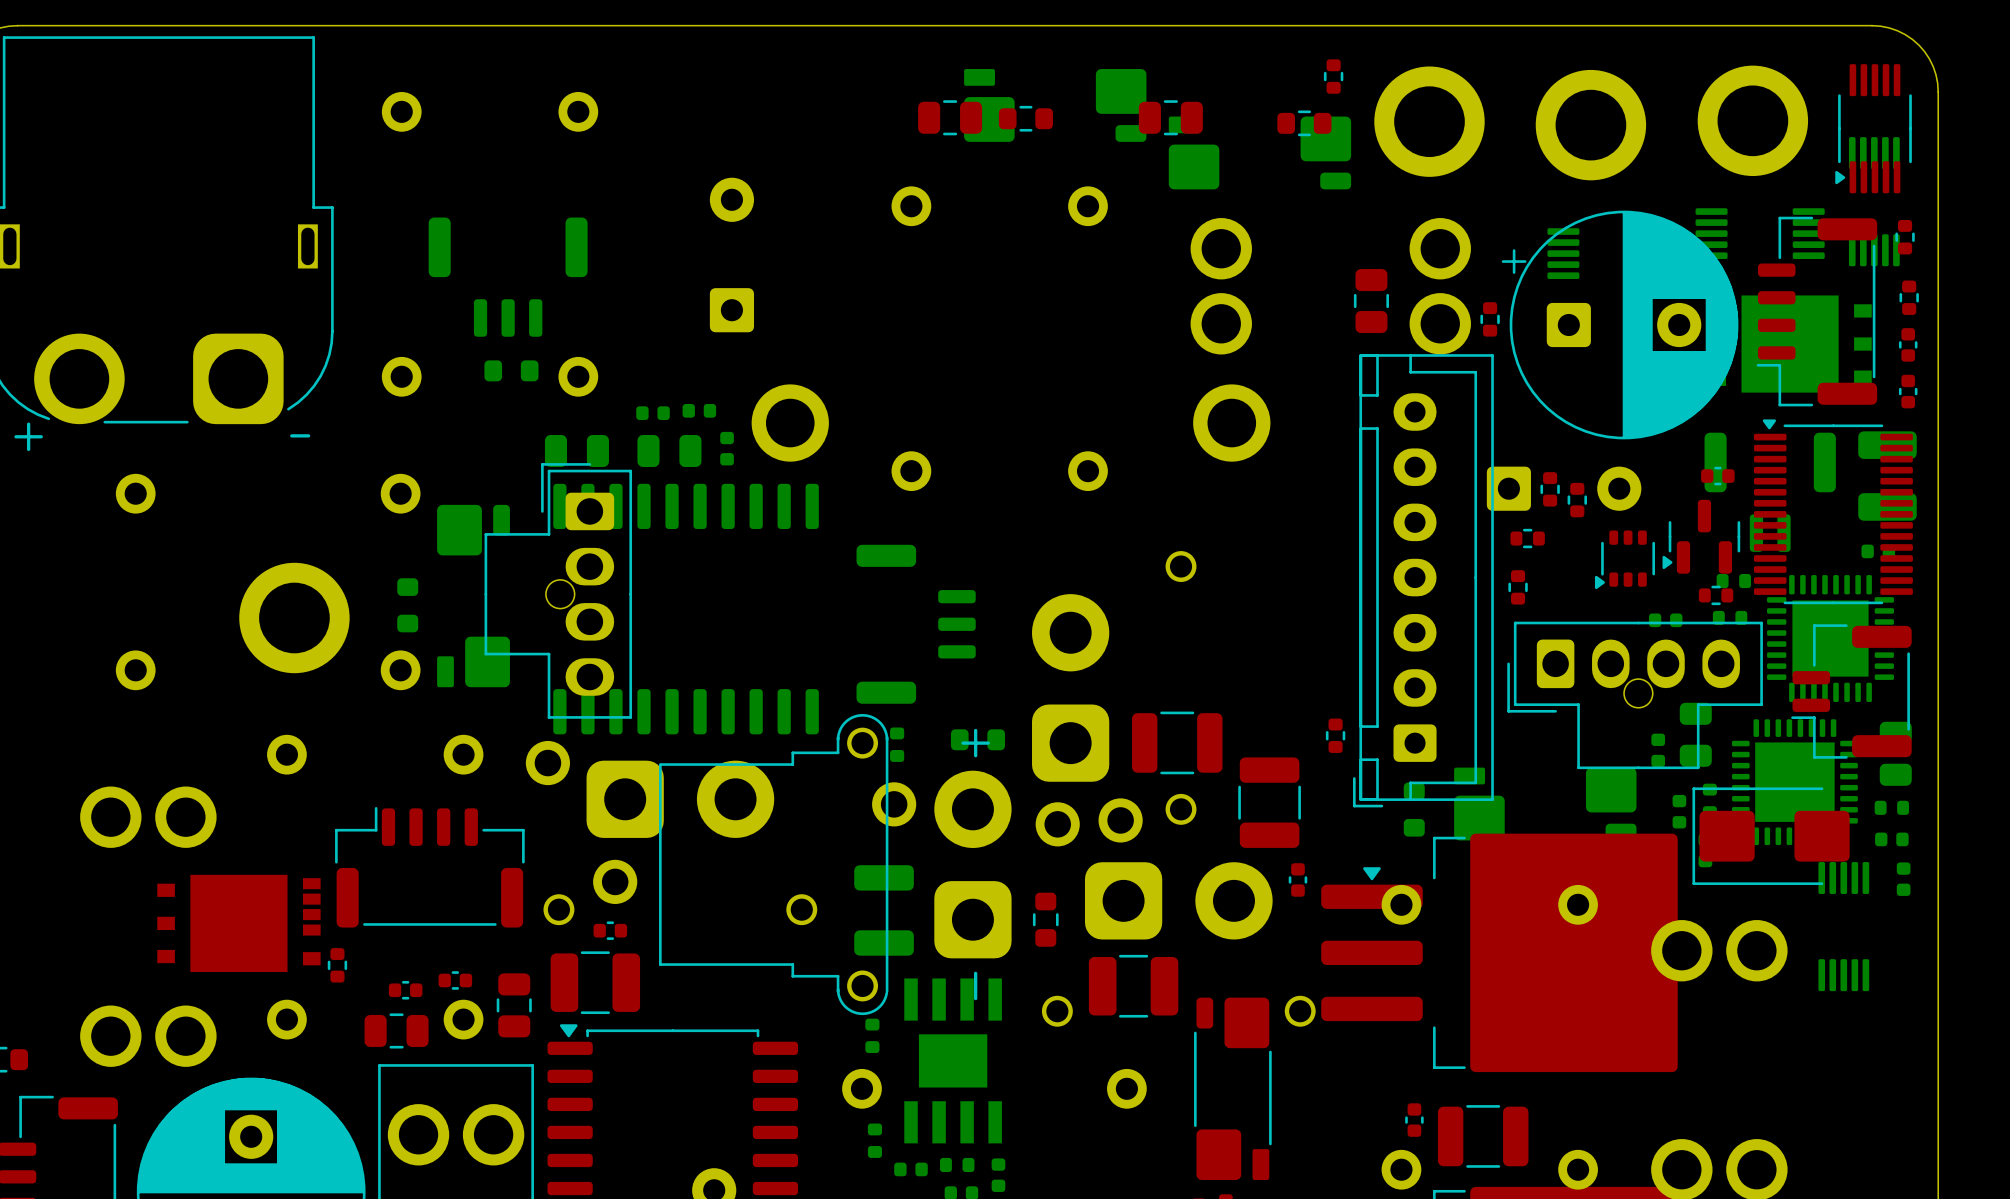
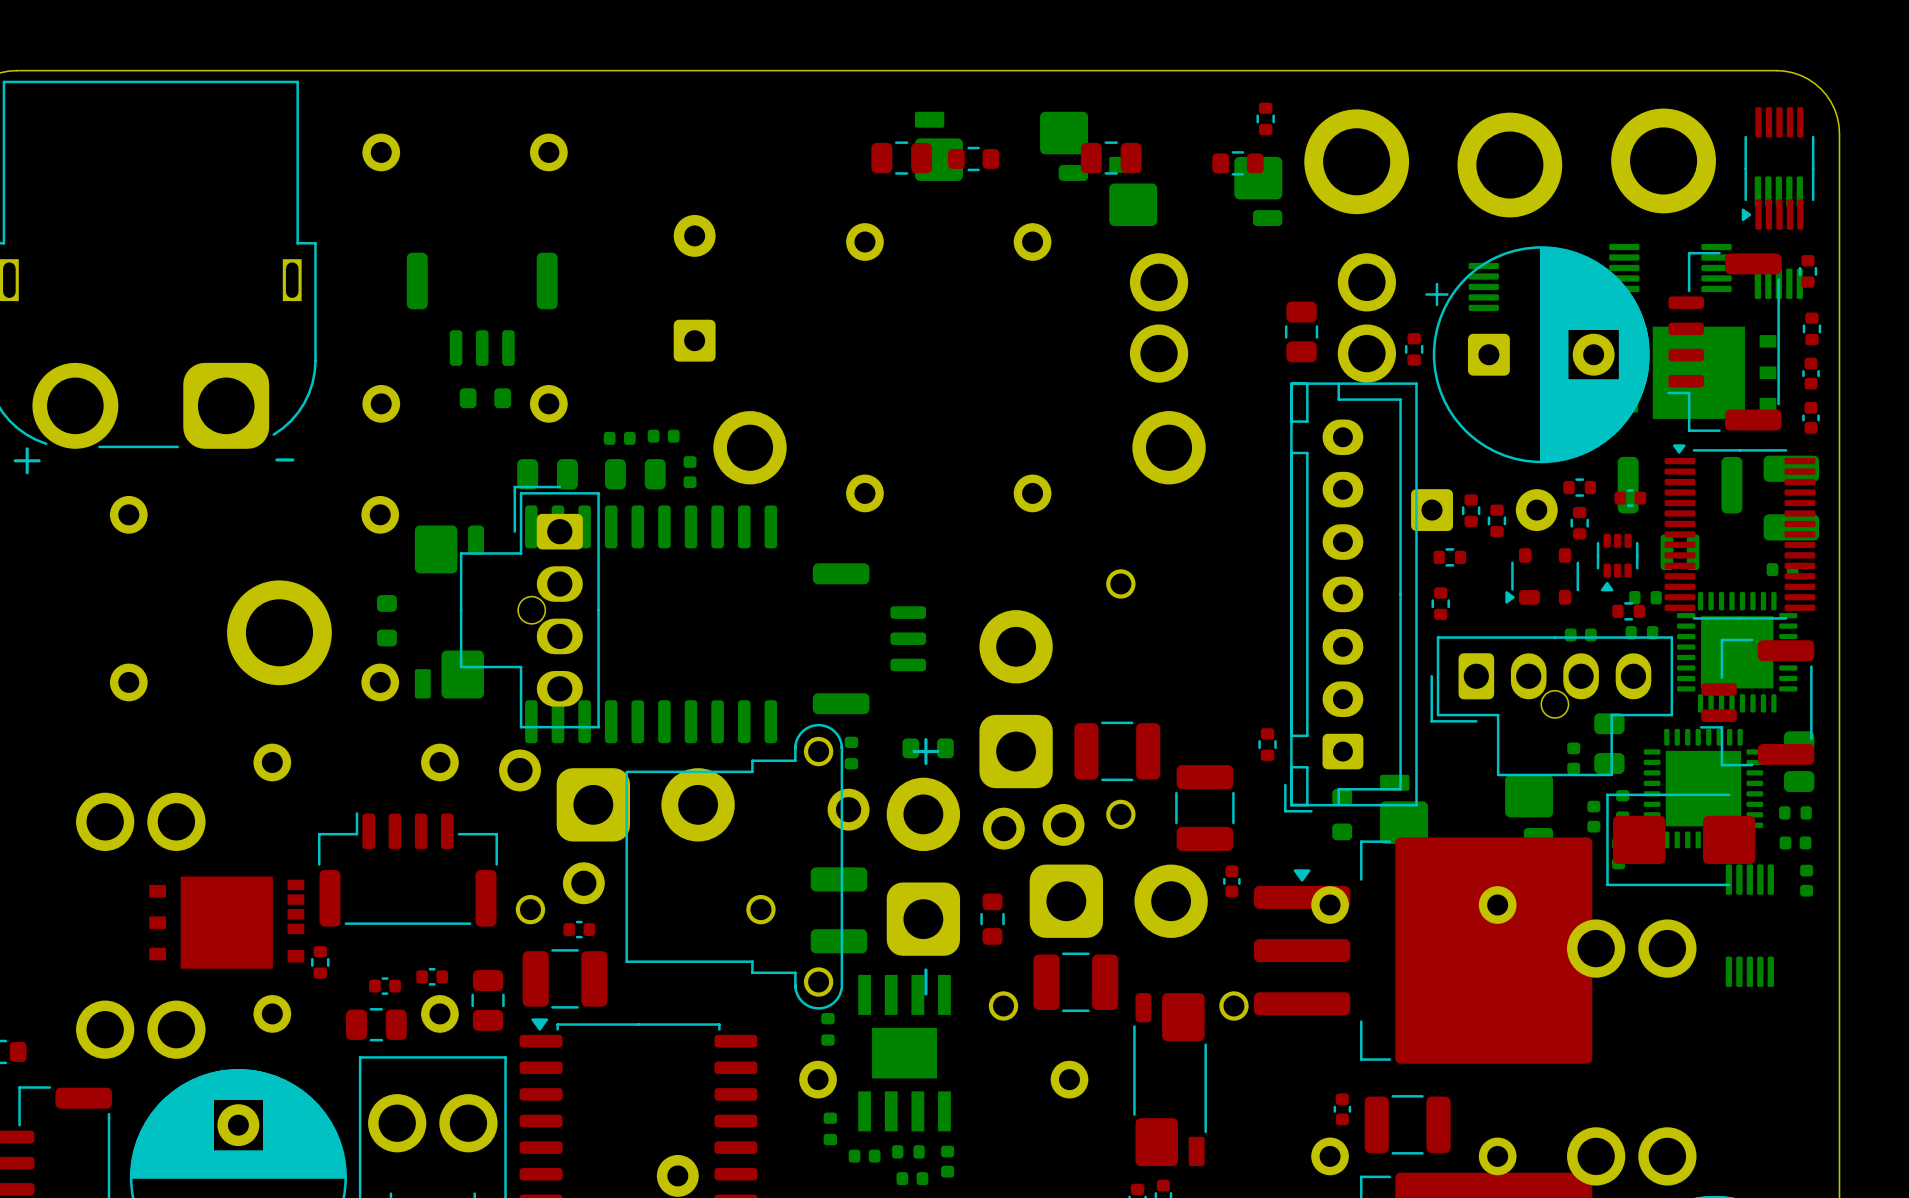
part: none -> (1579, 487)
part footprint: [1662, 499, 1741, 574] -> [1596, 533, 1639, 592]
part: none -> (1579, 523)
part footprint: [1594, 530, 1656, 590] -> [1505, 548, 1580, 605]

